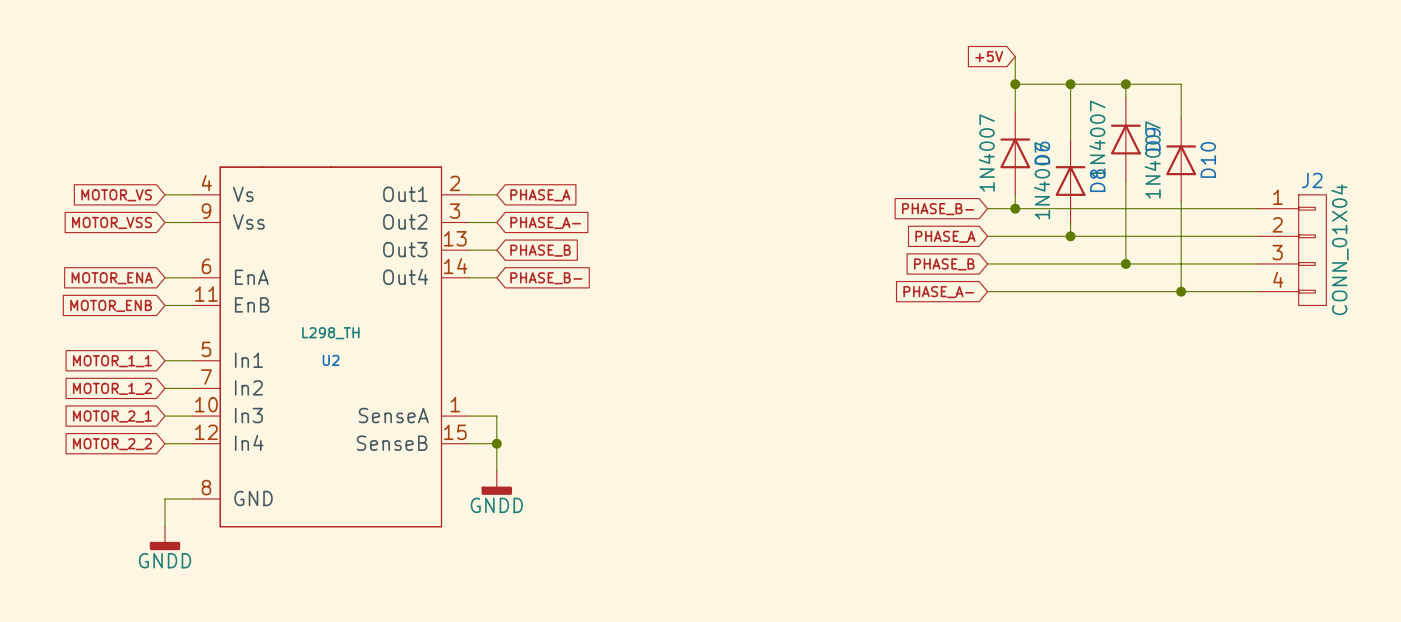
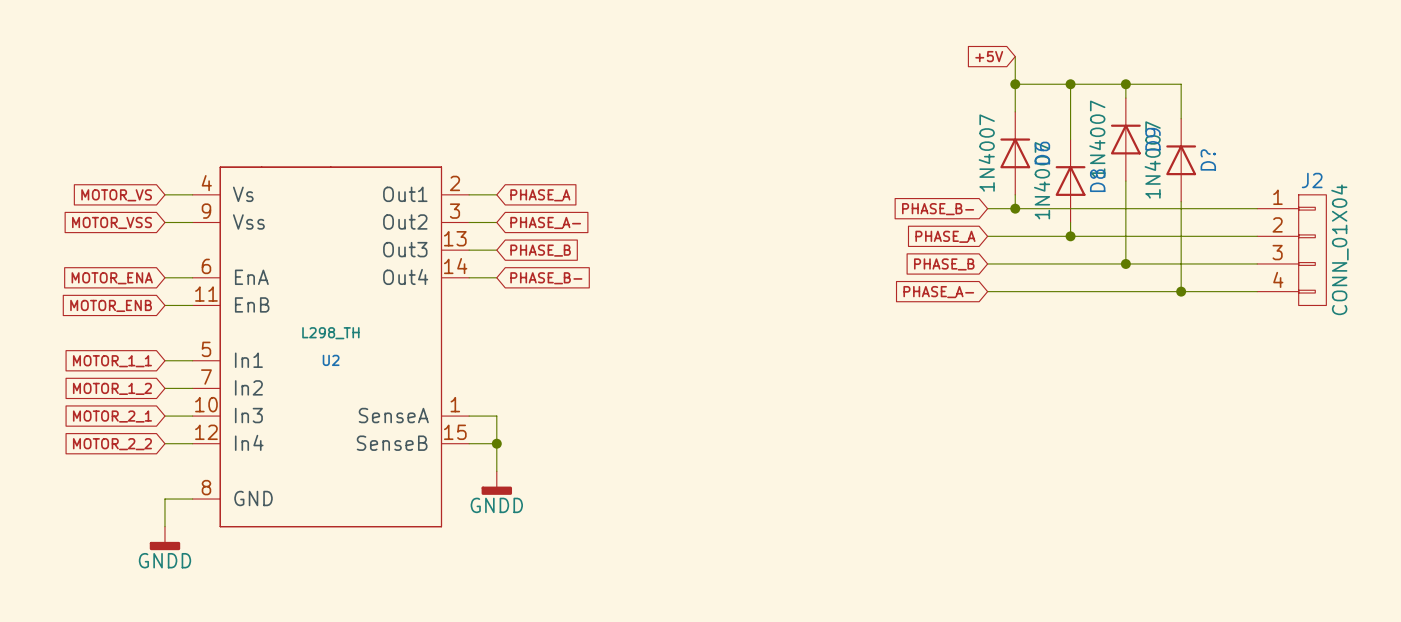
D10 name: D10 (1208, 159) -> D? (1208, 159)

